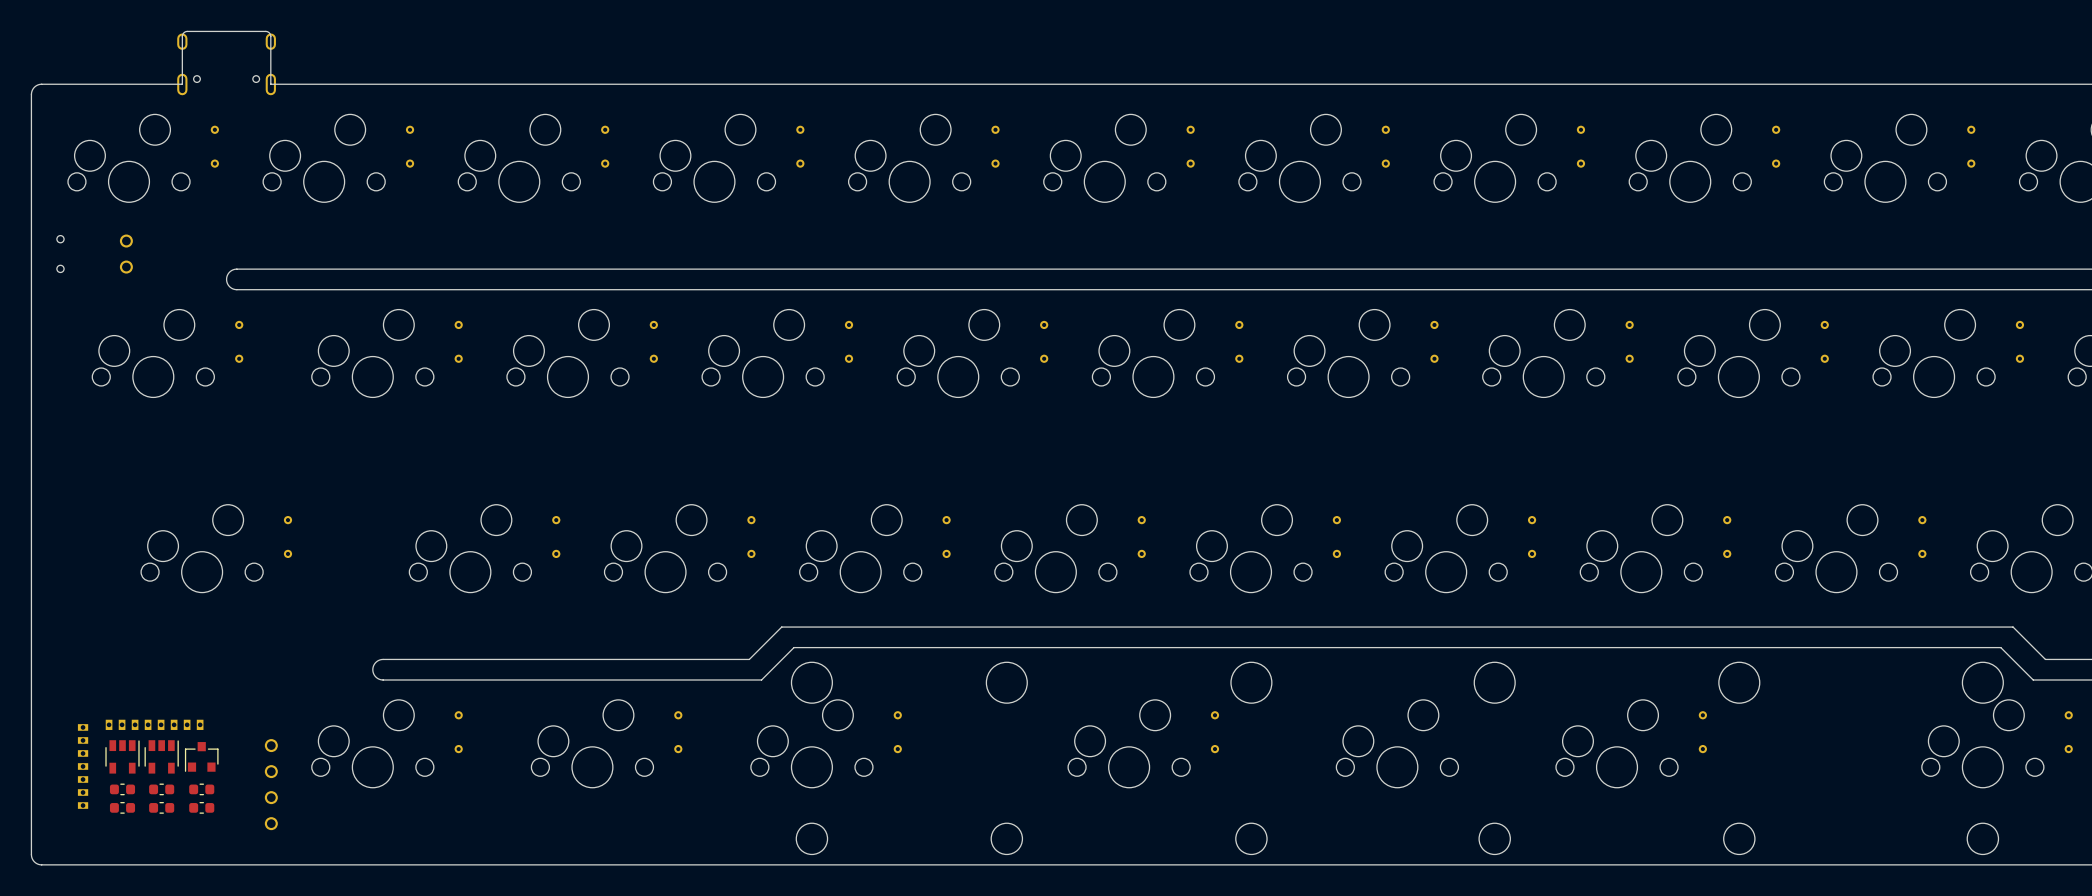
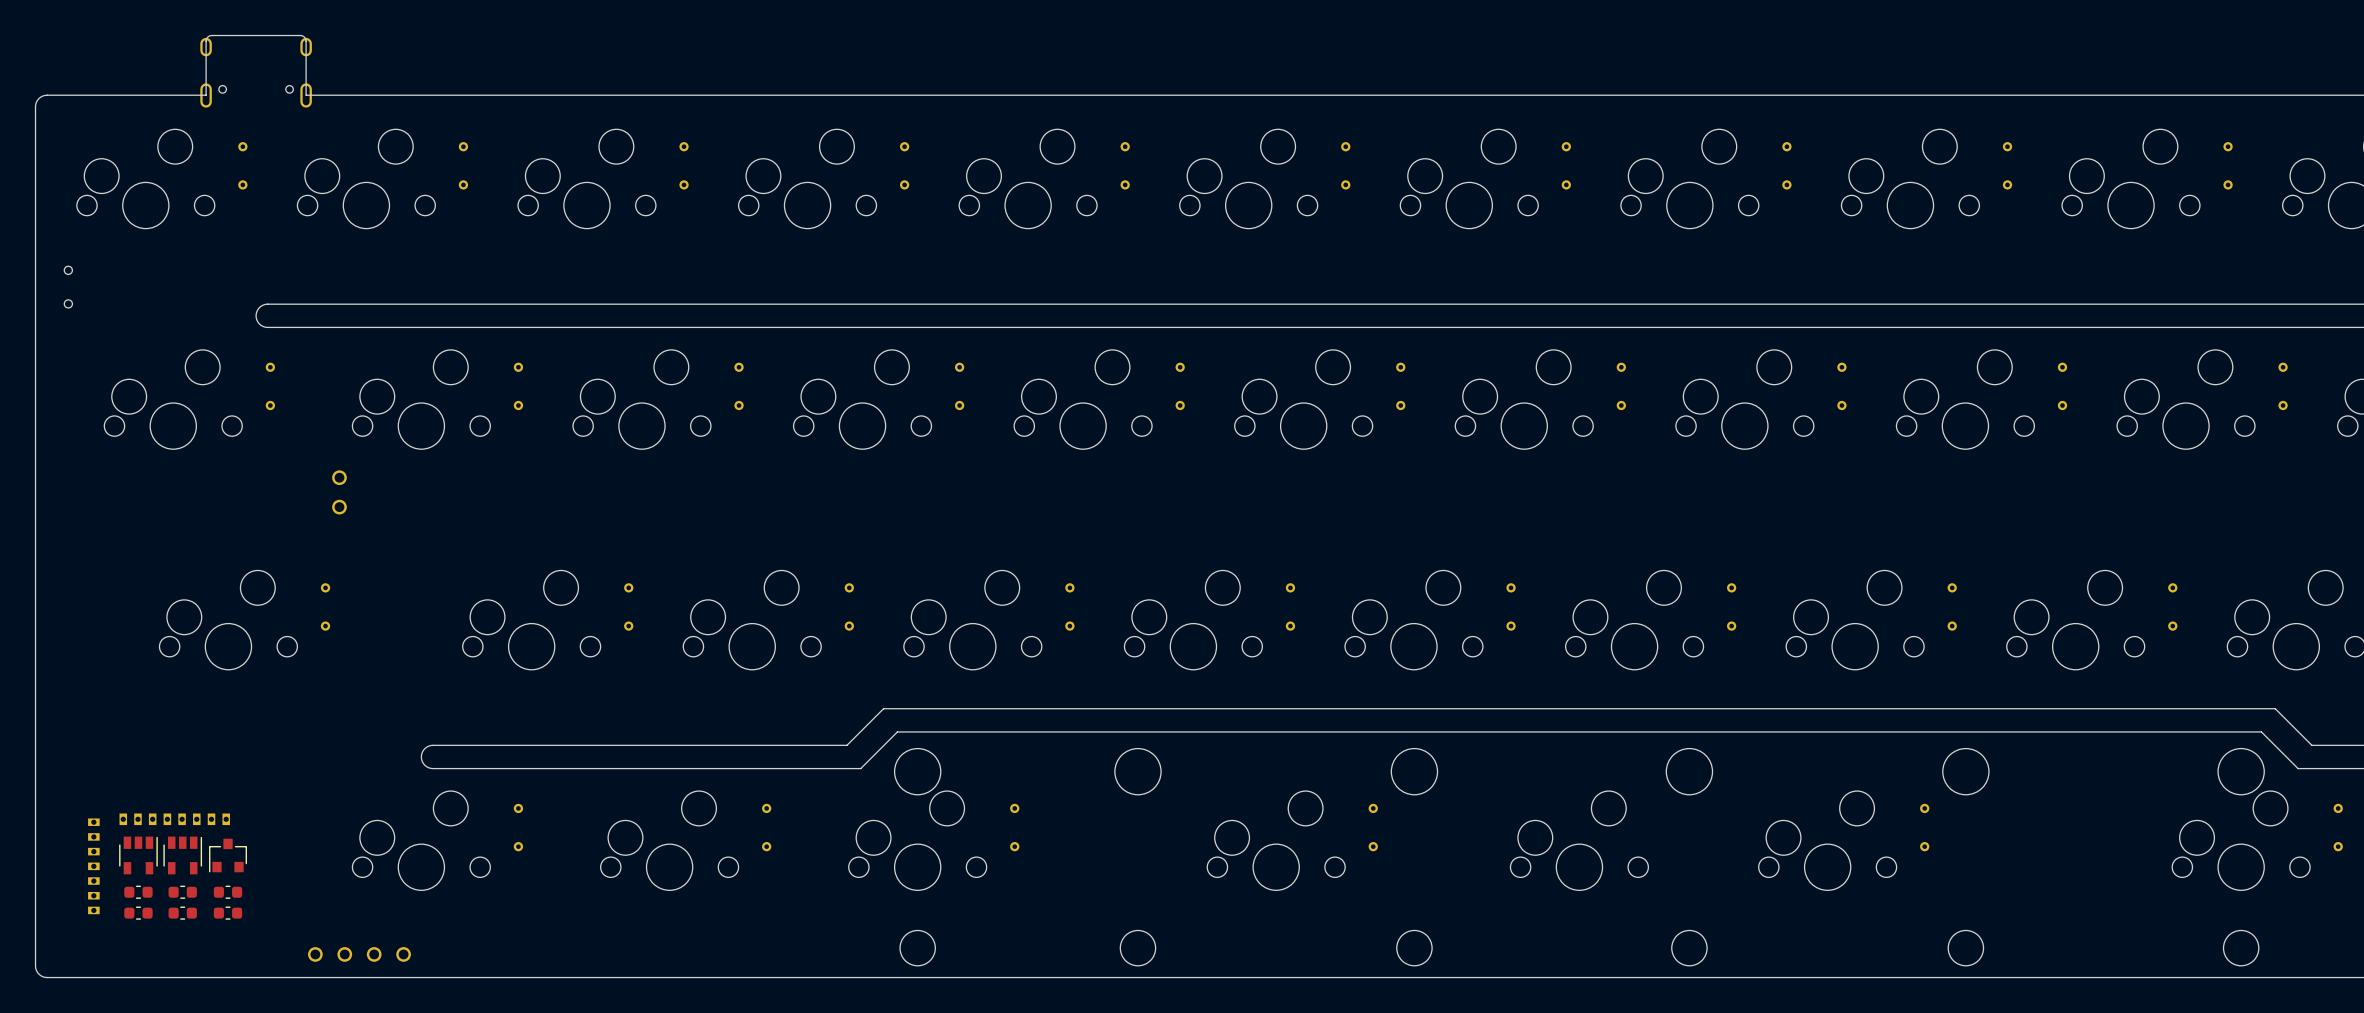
part position: (126, 254) -> (339, 492)
part rotation: 0° (271, 784) -> 90° clockwise (359, 954)
part position: (271, 784) -> (359, 954)

